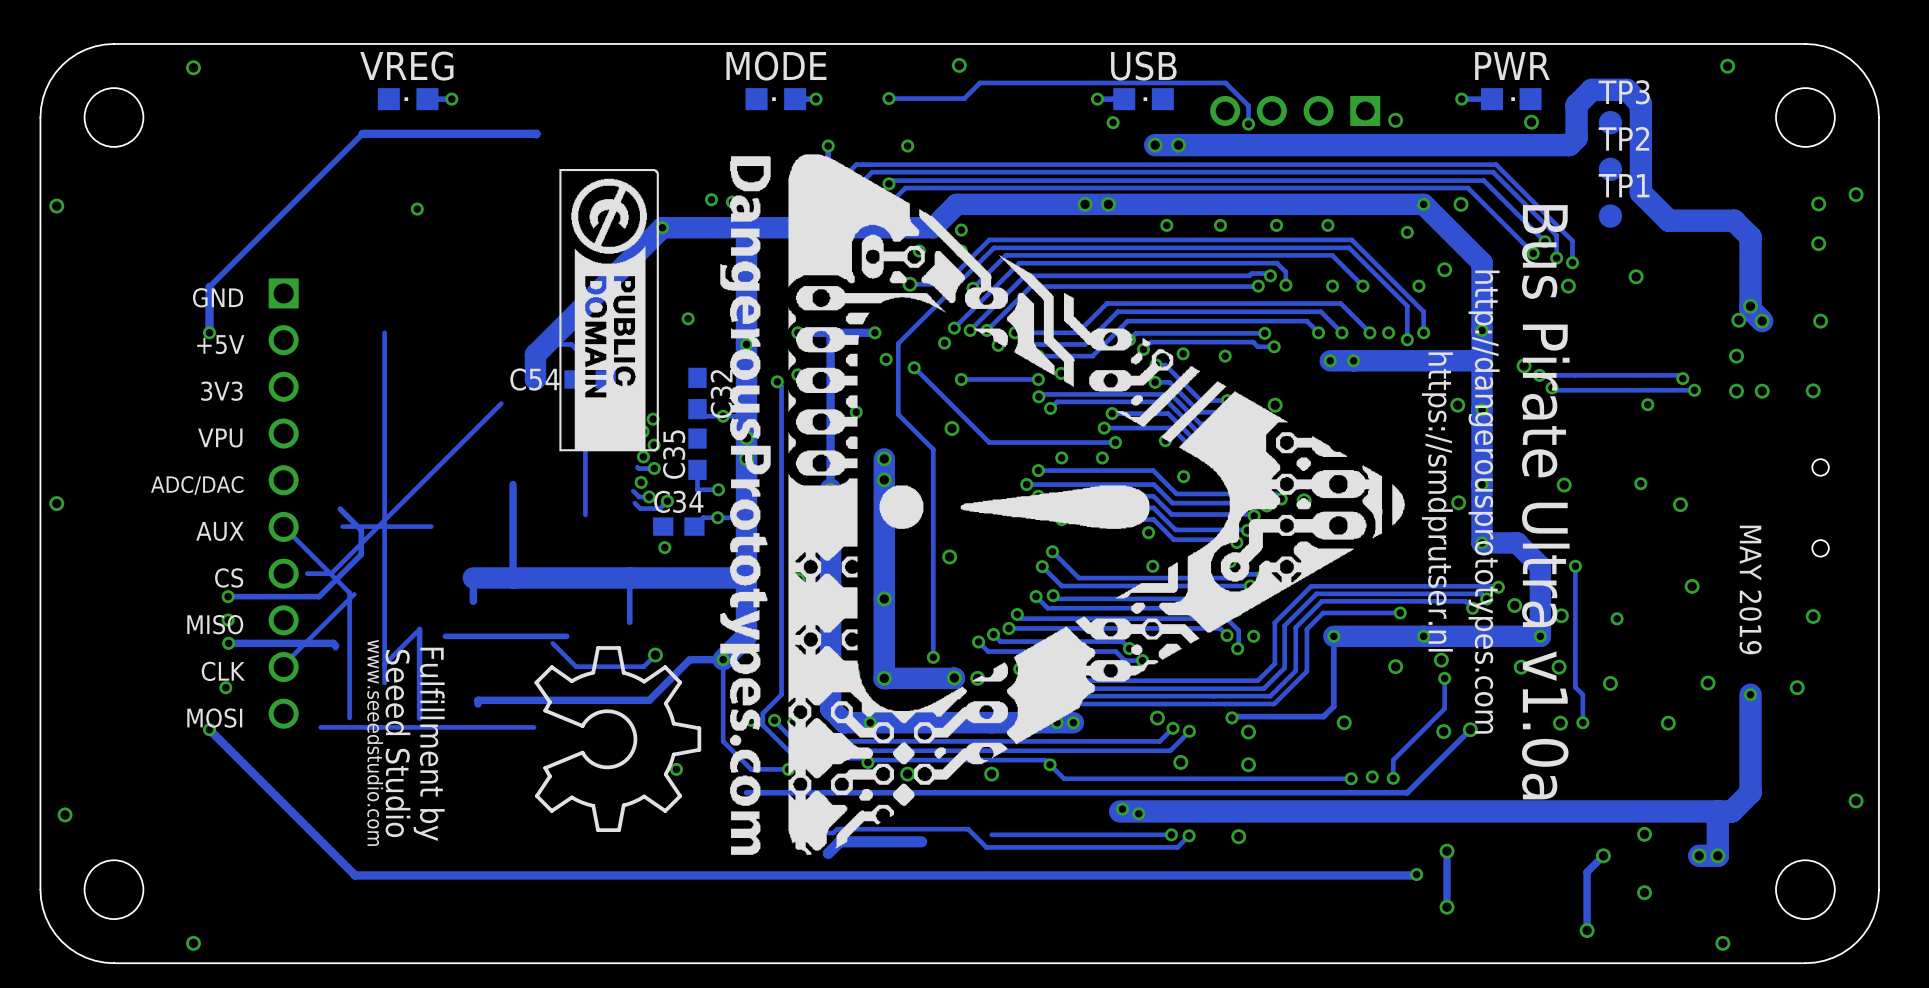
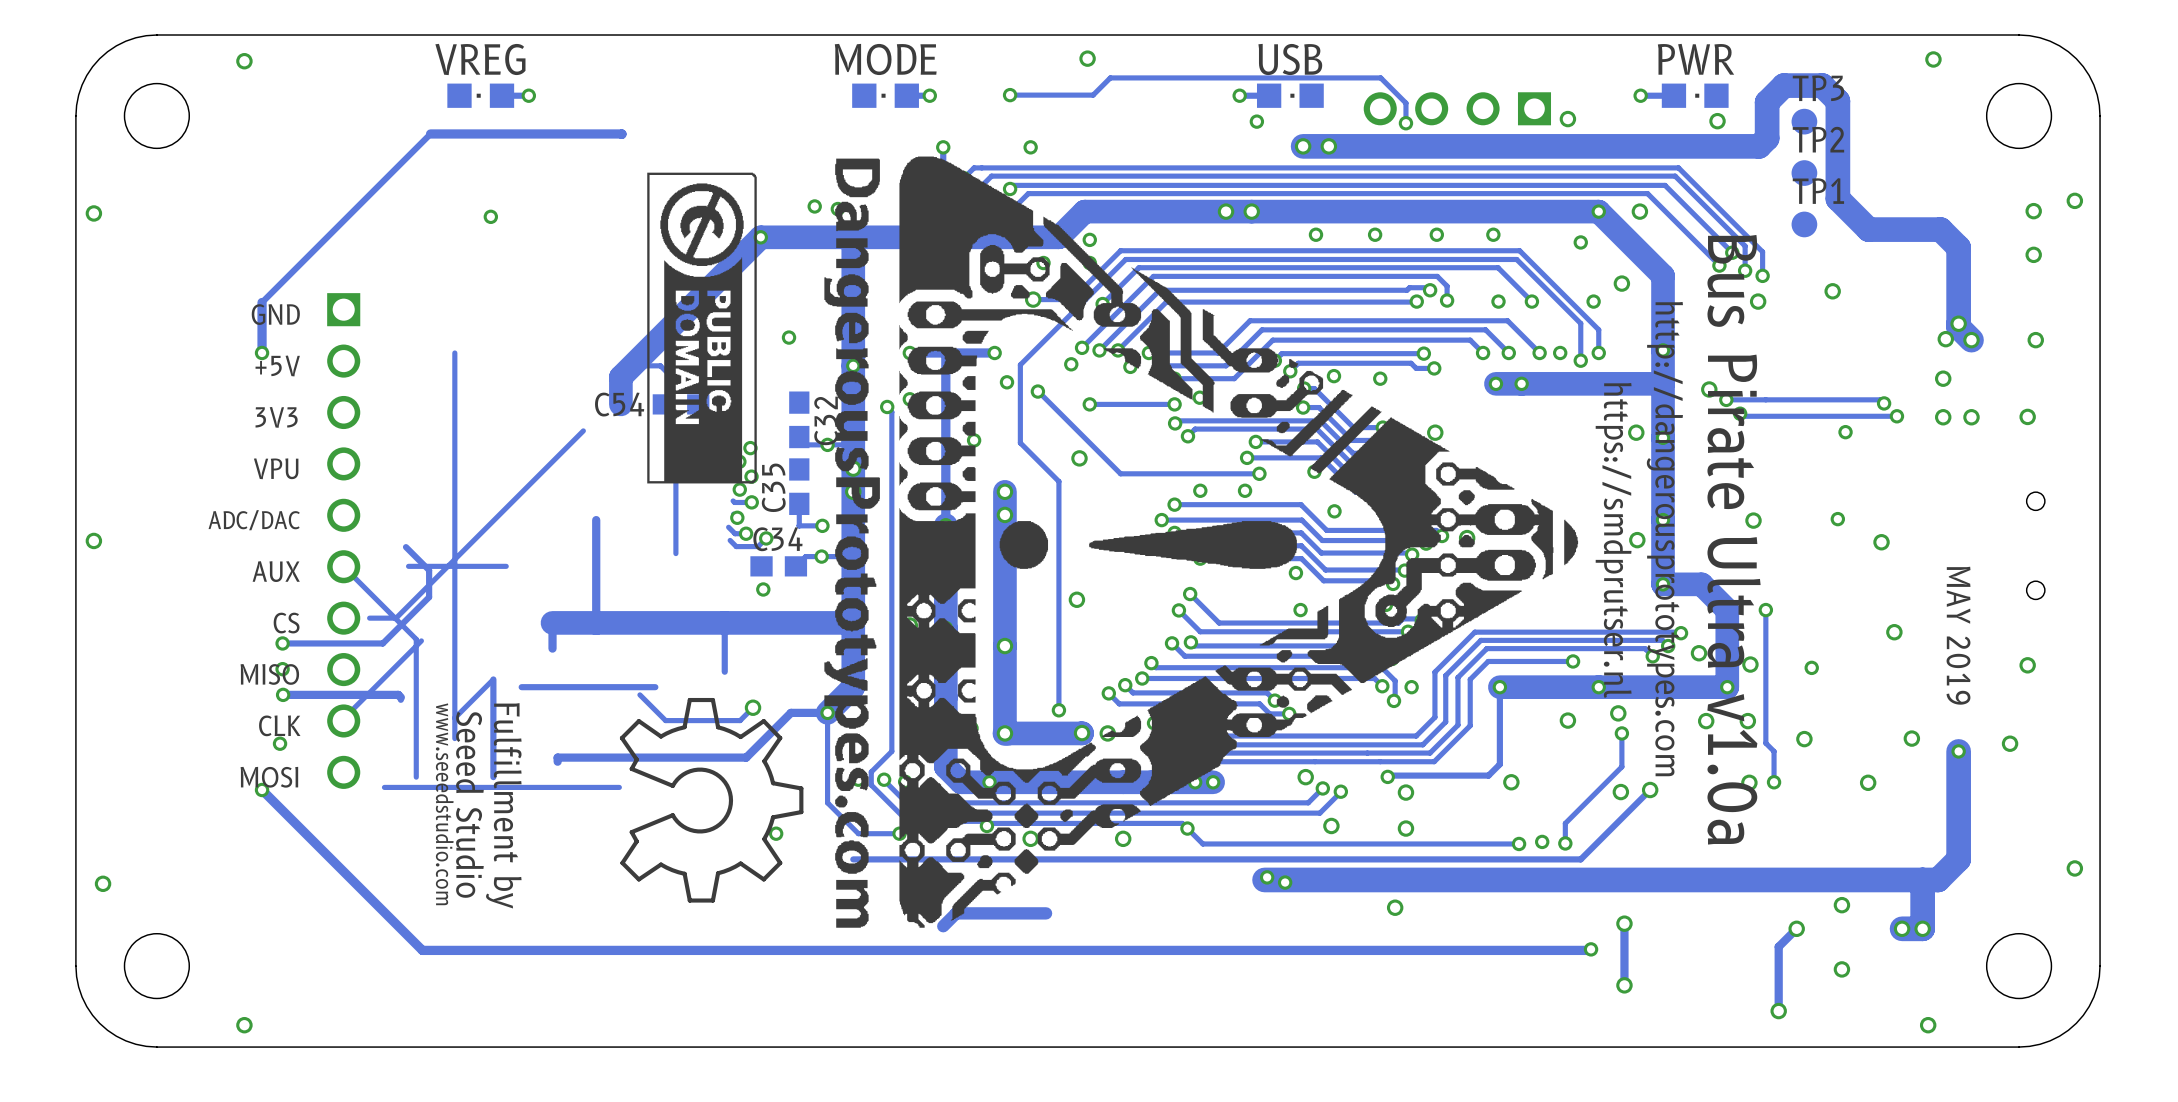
track: (821, 832) (833, 832) (837, 829) (968, 829) (986, 847) (1177, 847) (1189, 835) -> none
track: (1171, 834) (991, 834) -> none
via: (1171, 834) -> none
via: (1189, 835) -> none

